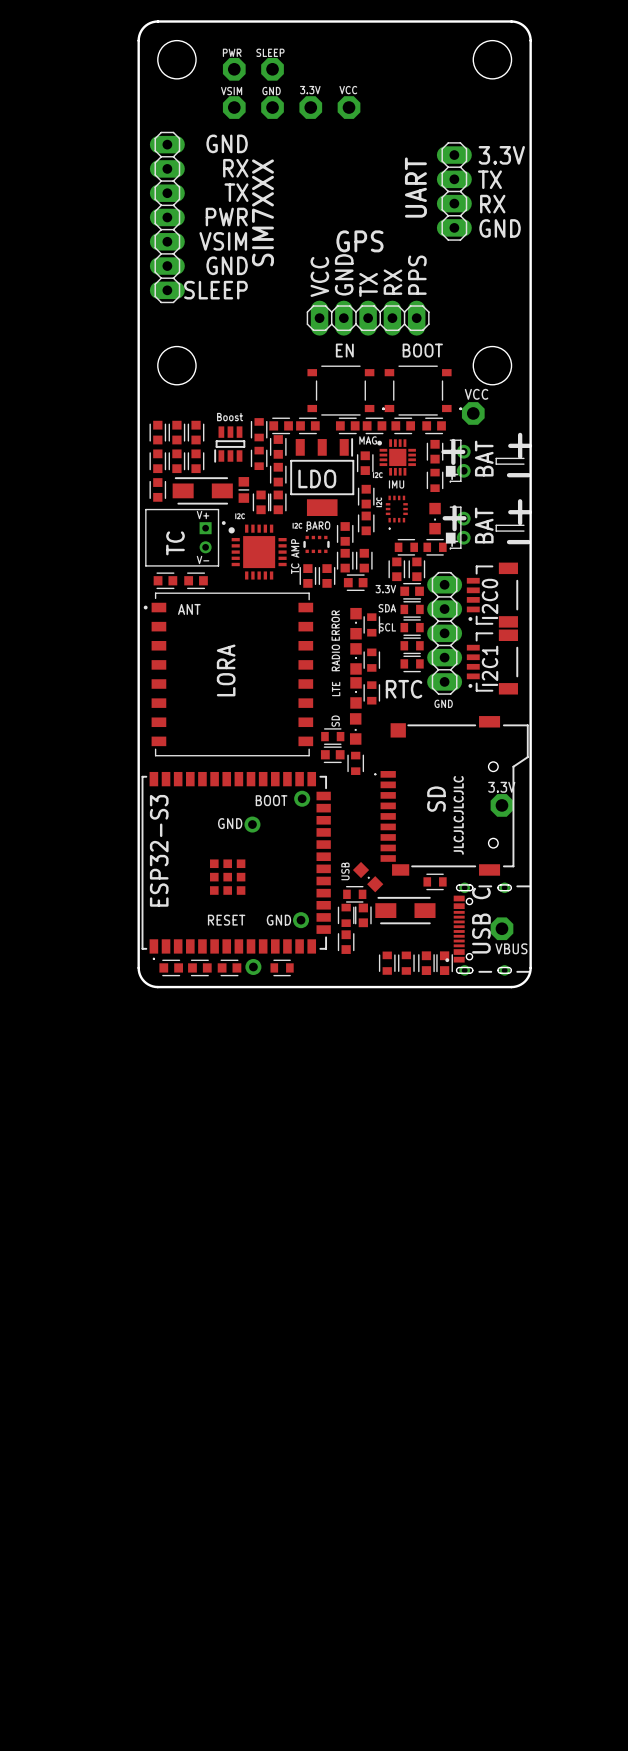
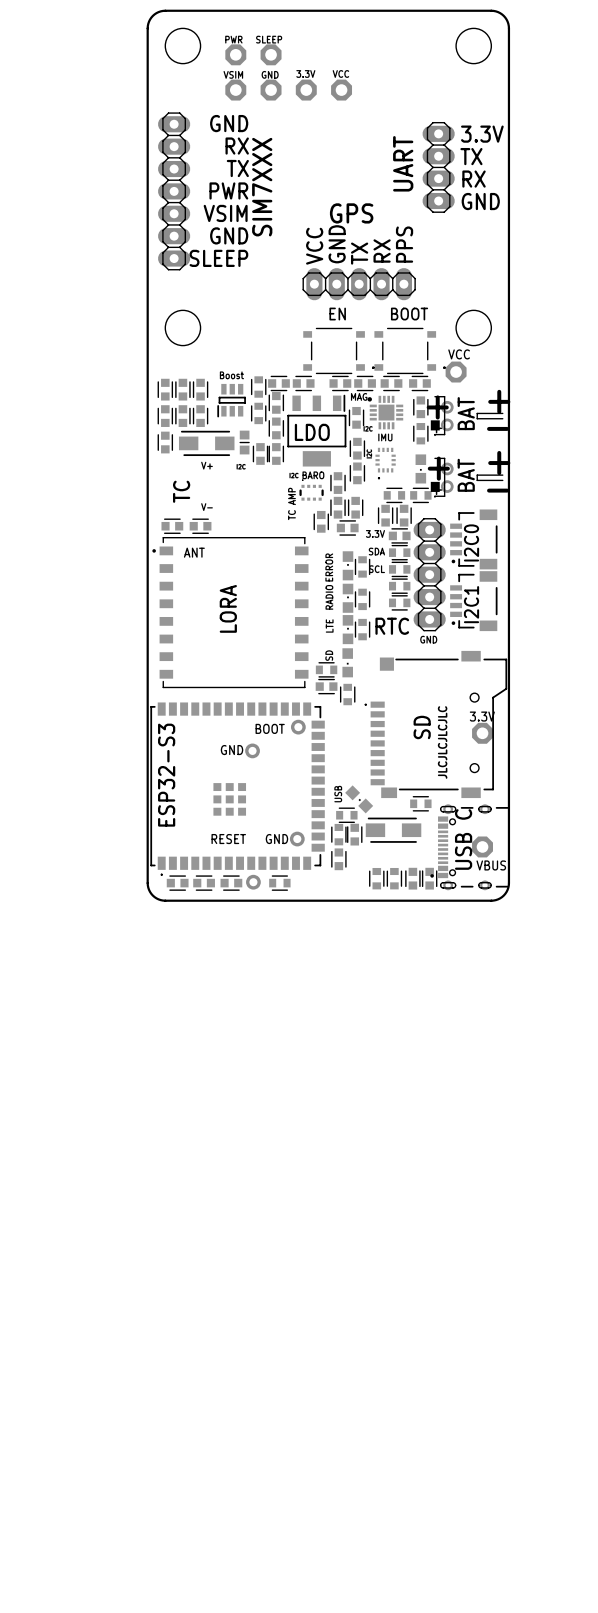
part: (185, 537) -> none
part: (257, 552) -> none
part: (307, 575) -> none

